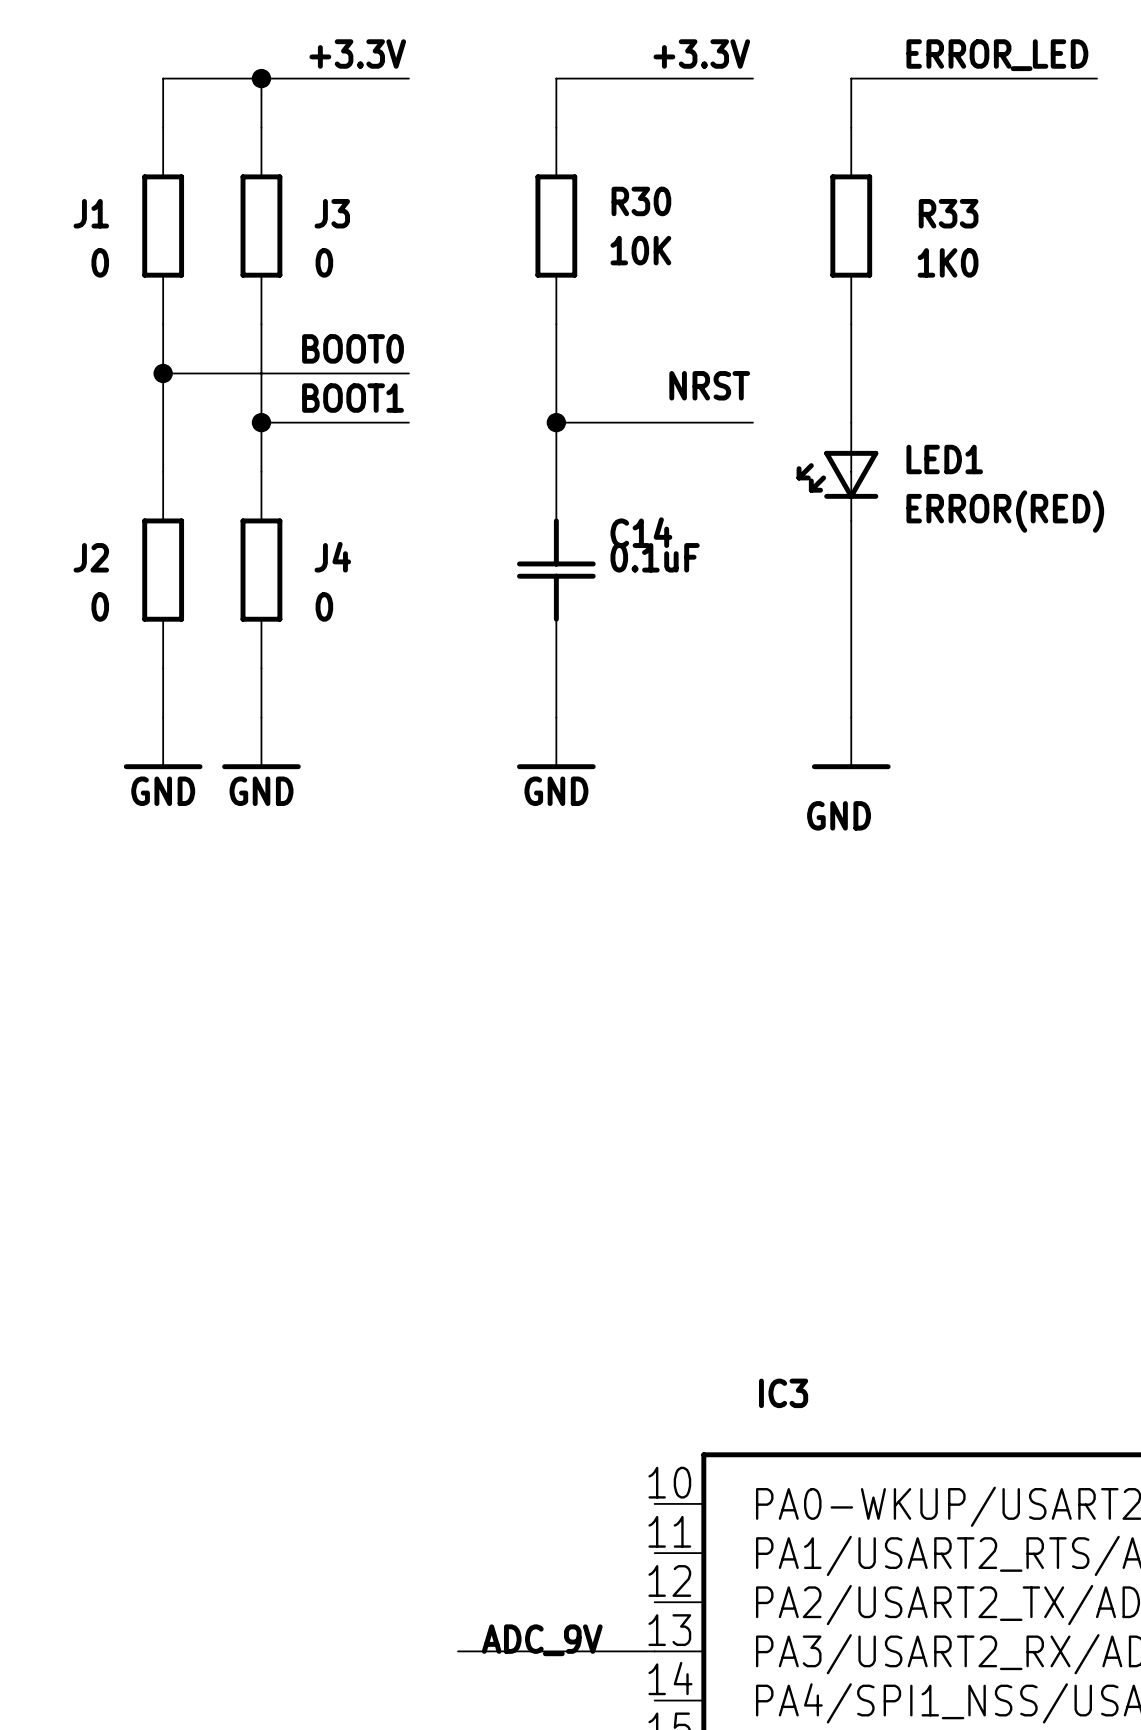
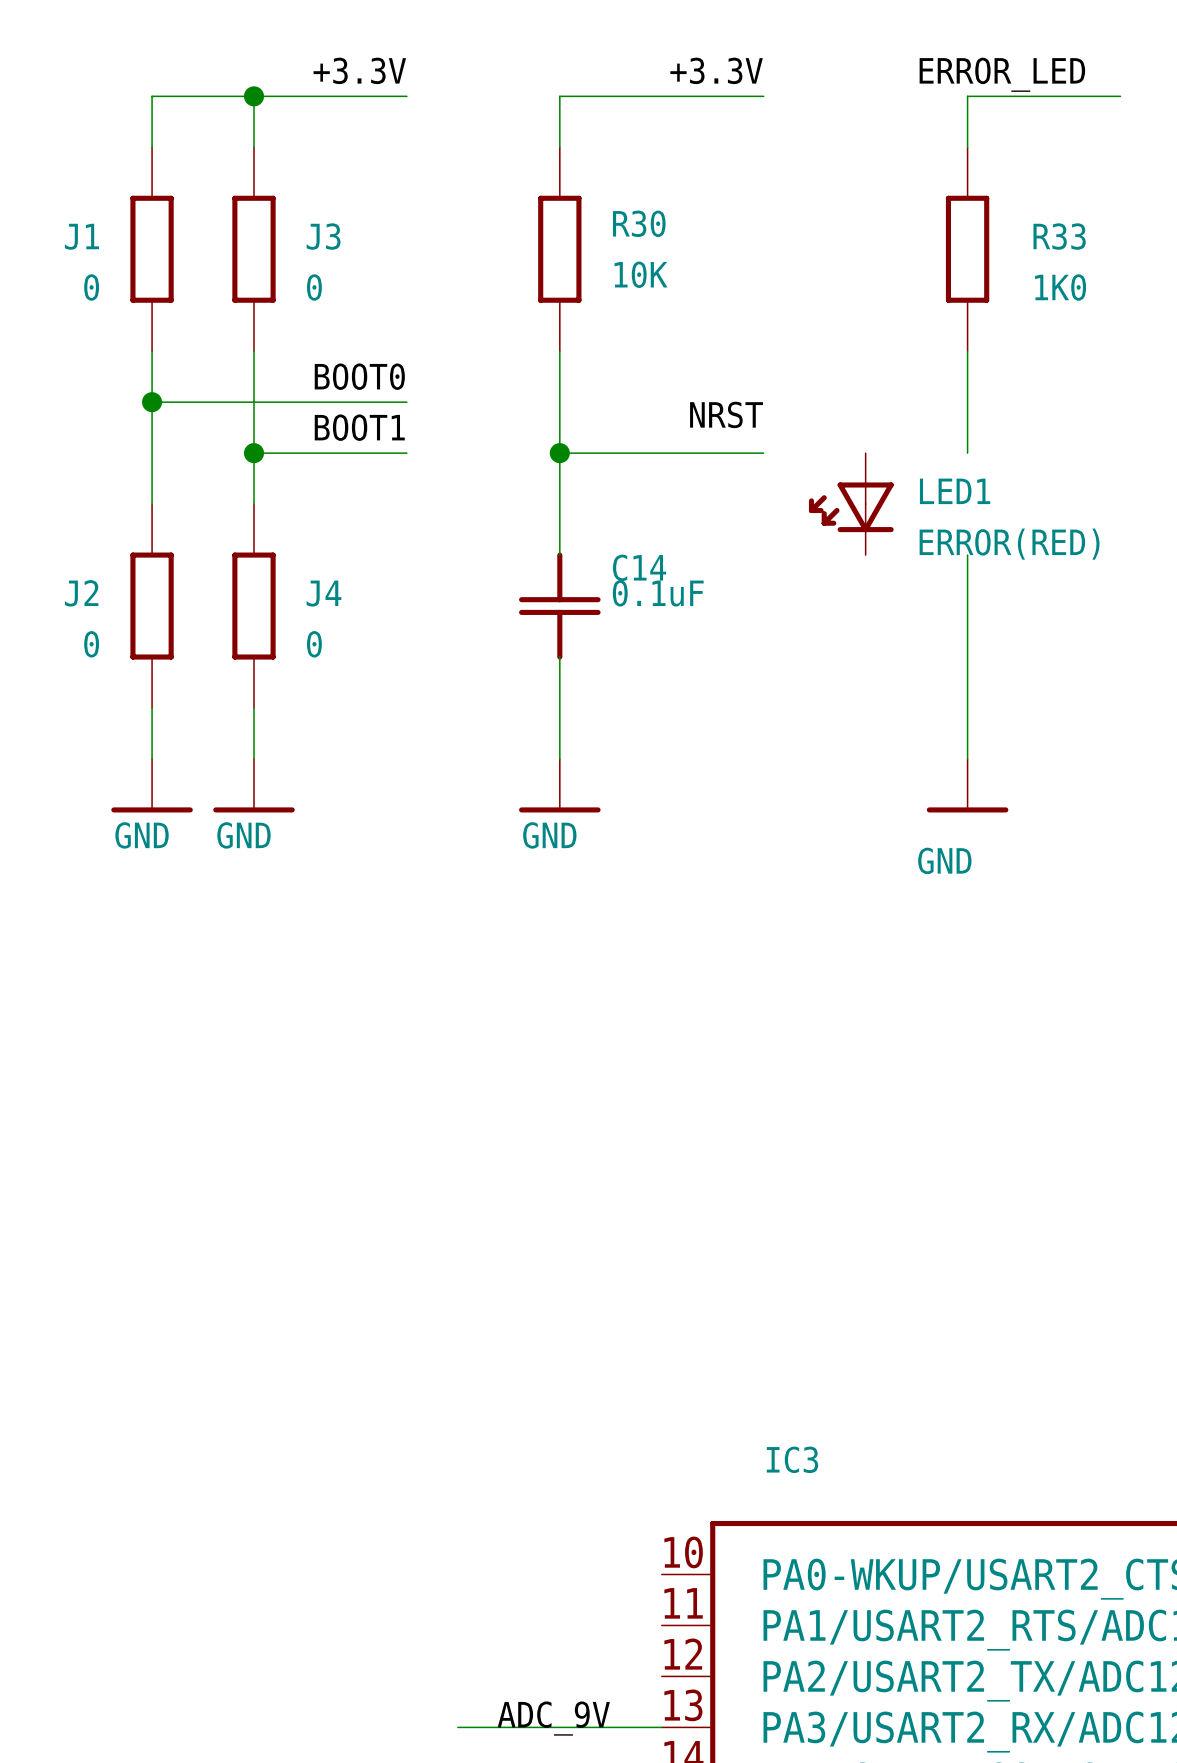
wire: (949, 78) (851, 78) (851, 127) -> (967, 96) (967, 147)
R33 position: (851, 226) -> (967, 249)
wire: (851, 324) (851, 422) -> (967, 351) (967, 453)
wire: (851, 520) (851, 717) -> (967, 555) (967, 758)
power symbol position: GND (851, 743) -> GND (967, 785)

